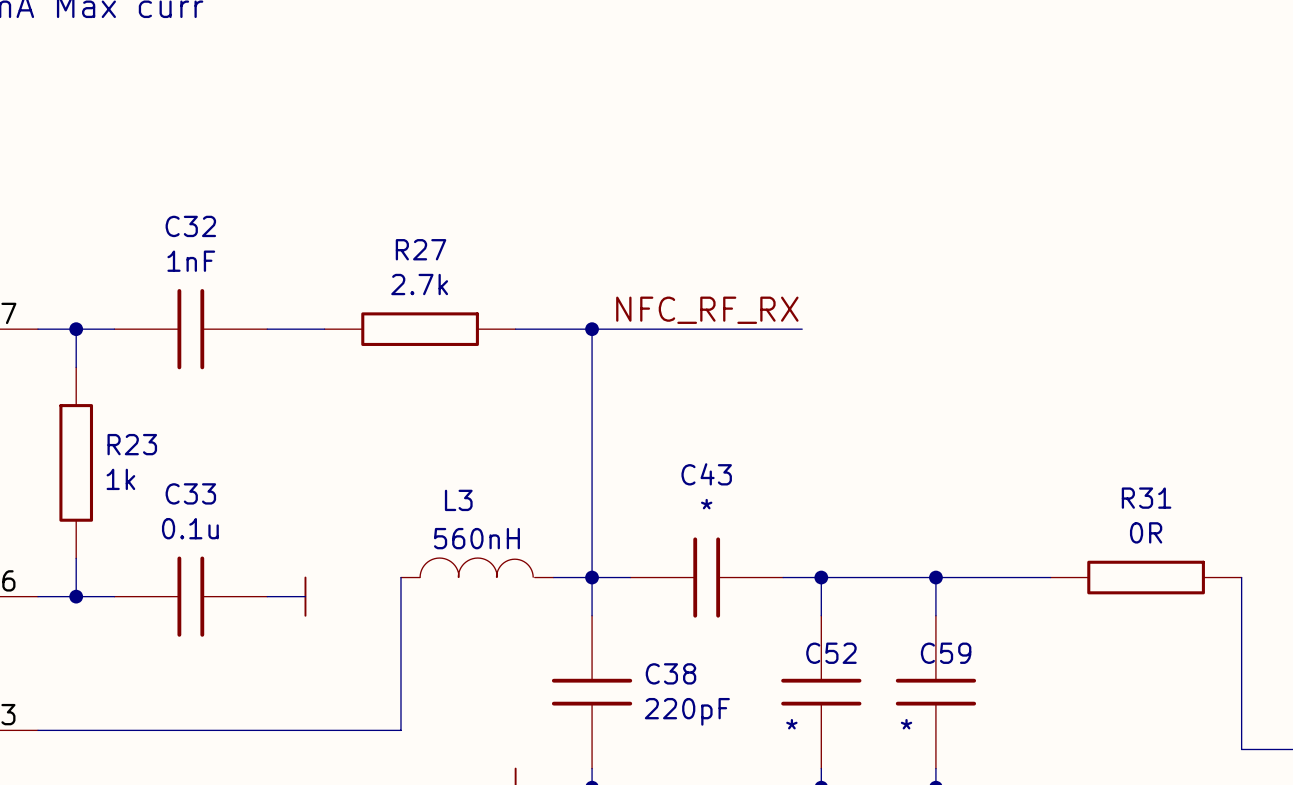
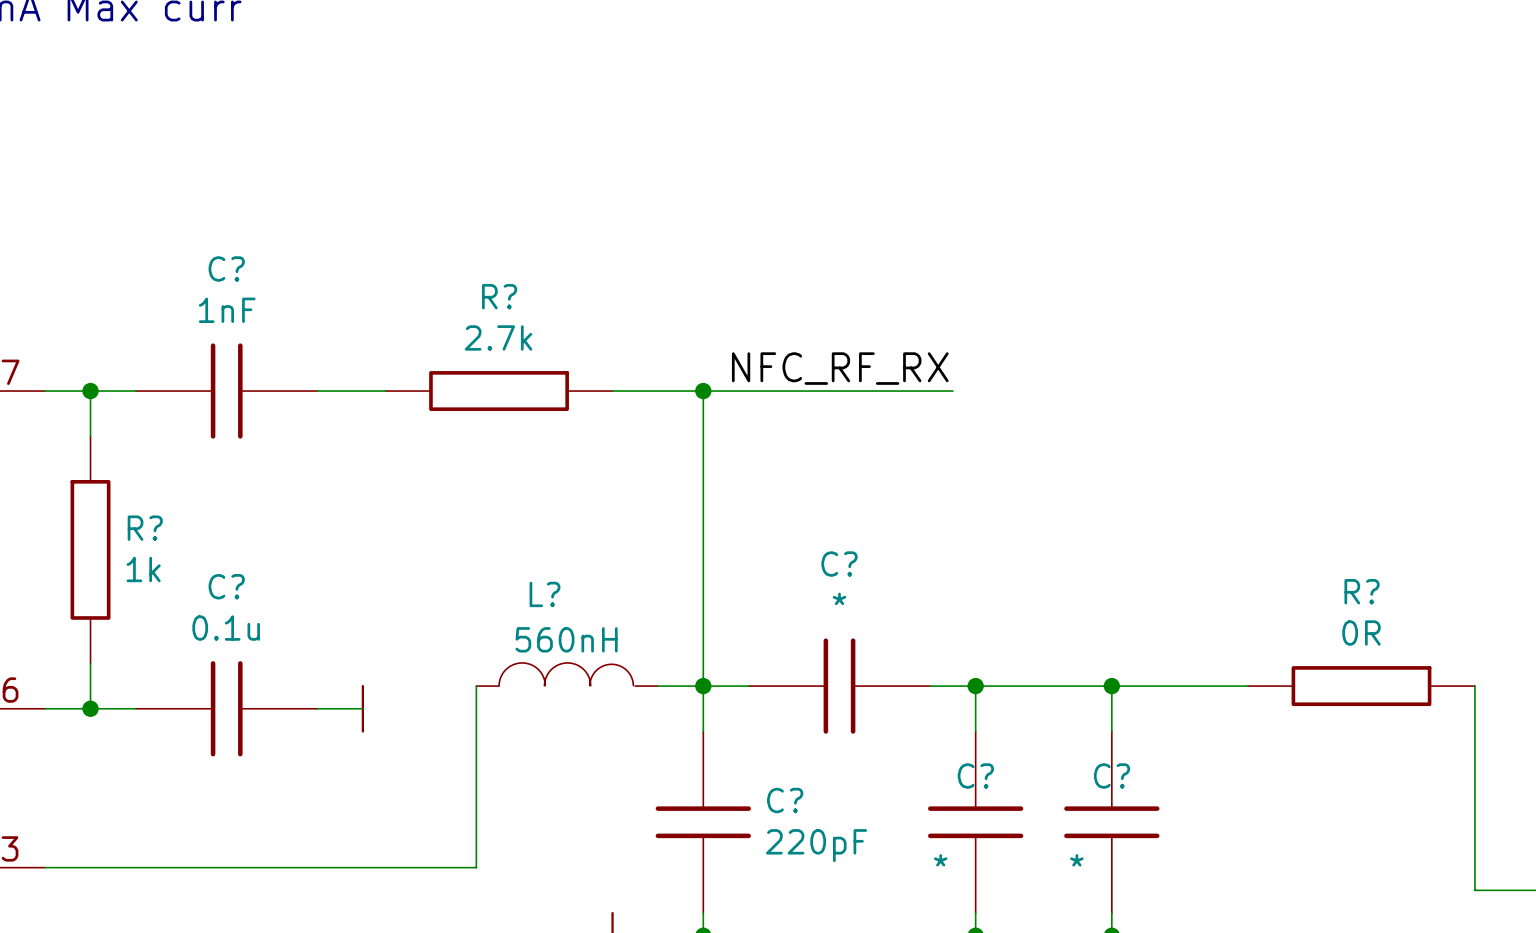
C32 name: C32 (190, 226) -> C? (226, 268)
R27 name: R27 (421, 249) -> R? (499, 296)
R23 name: R23 (132, 444) -> R? (145, 528)
C43 name: C43 (706, 474) -> C? (839, 564)
C33 name: C33 (190, 493) -> C? (226, 586)
R31 name: R31 (1146, 498) -> R? (1362, 591)
L3 name: L3 (458, 500) -> L? (544, 594)
C52 name: C52 (831, 653) -> C? (975, 776)
C59 name: C59 (946, 653) -> C? (1112, 776)
C38 name: C38 (670, 673) -> C? (785, 800)

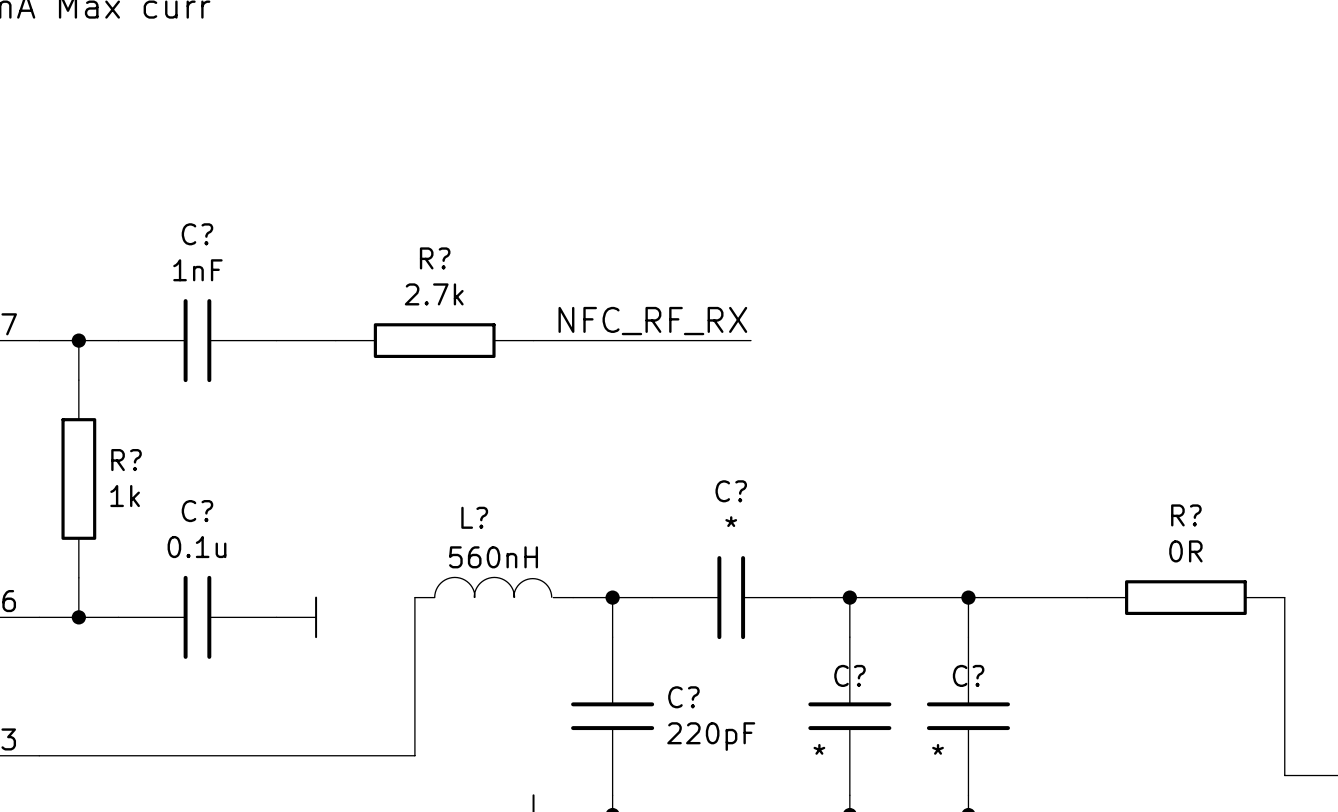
label position: NFC_RF_RX (840, 368) -> NFC_RF_RX (652, 321)
wire: (703, 391) (703, 686) -> none
junction: (703, 391) -> none
wire: (862, 391) (952, 391) -> none

